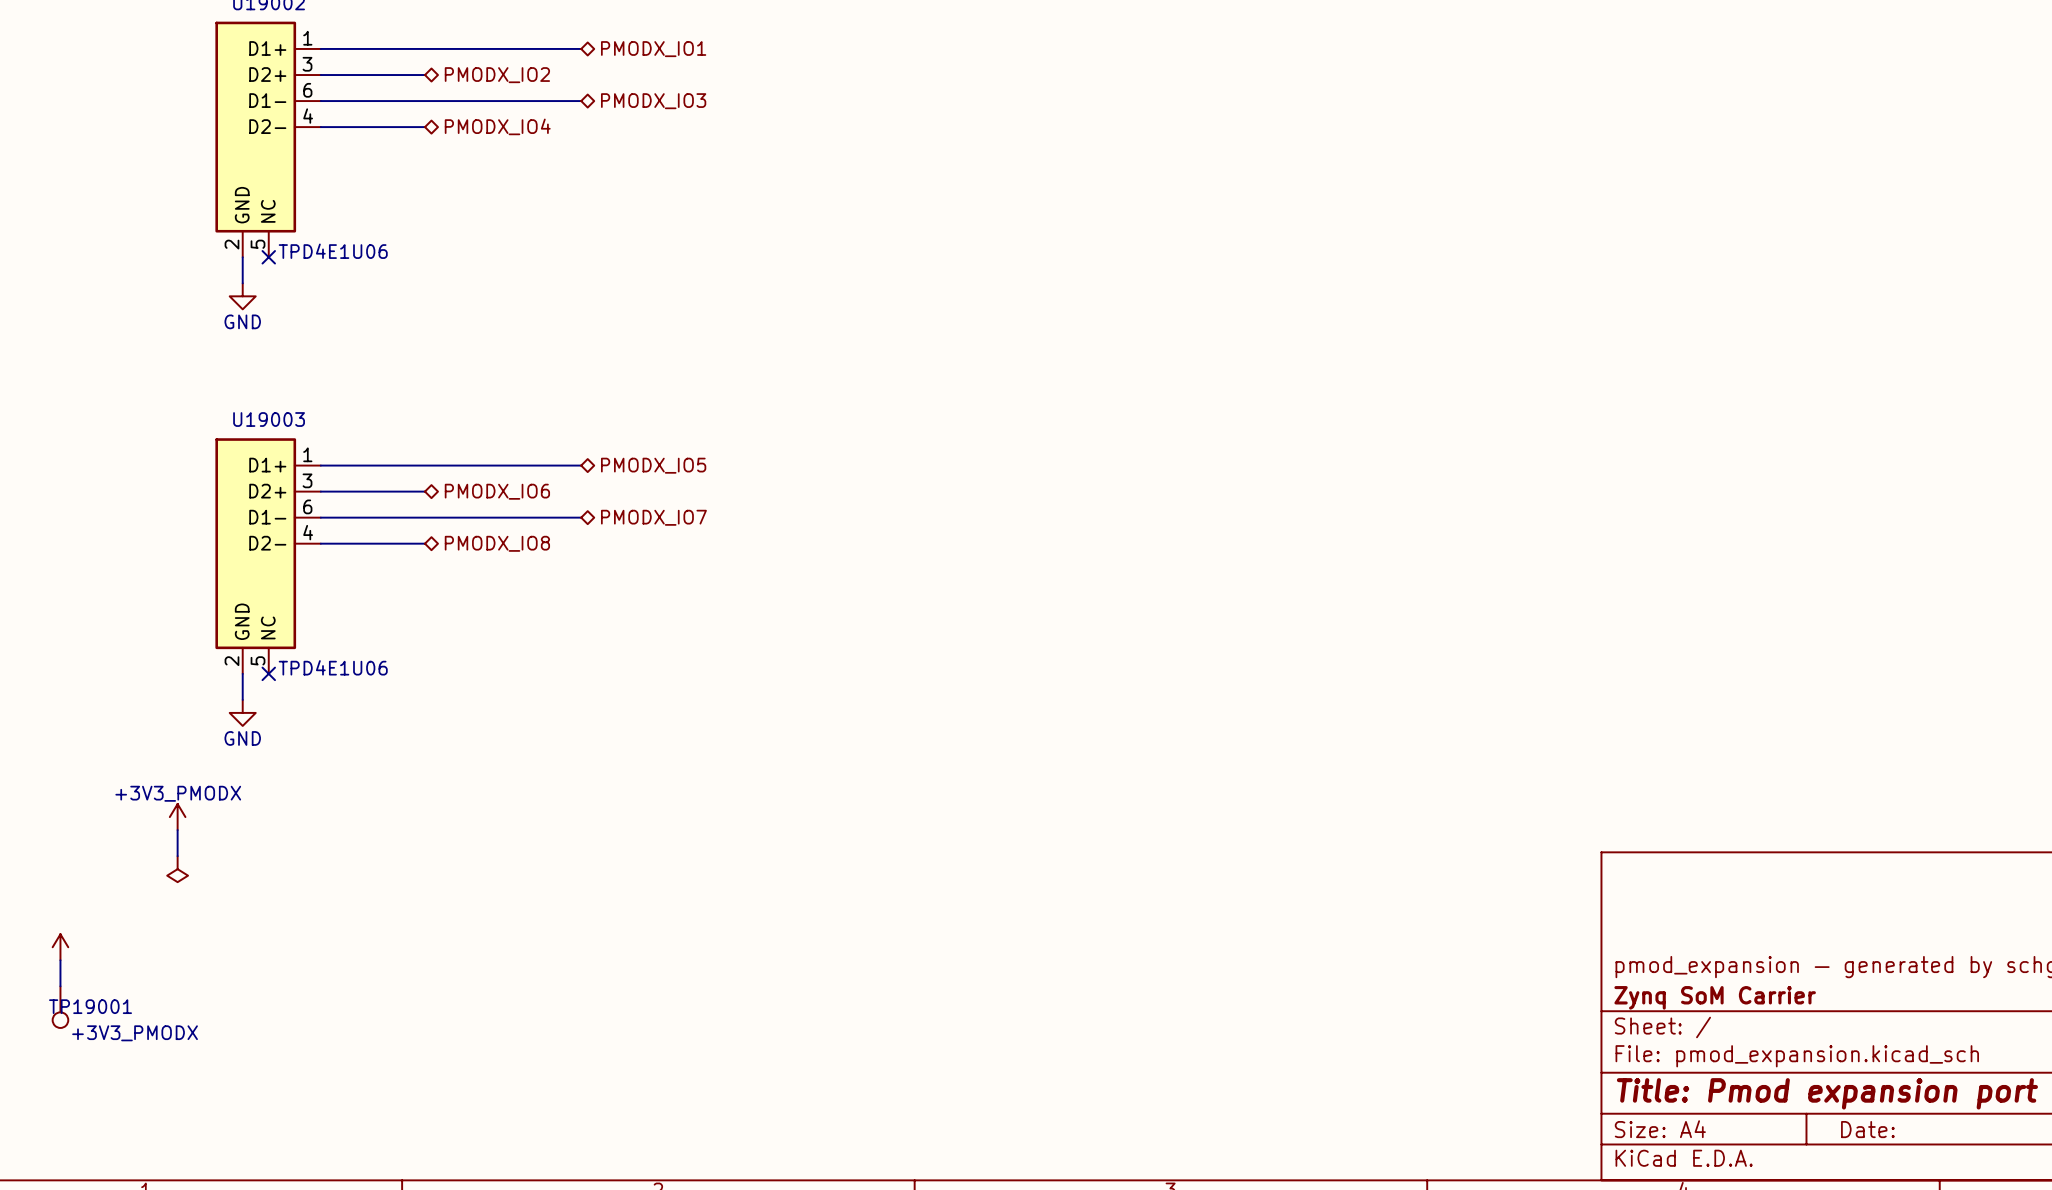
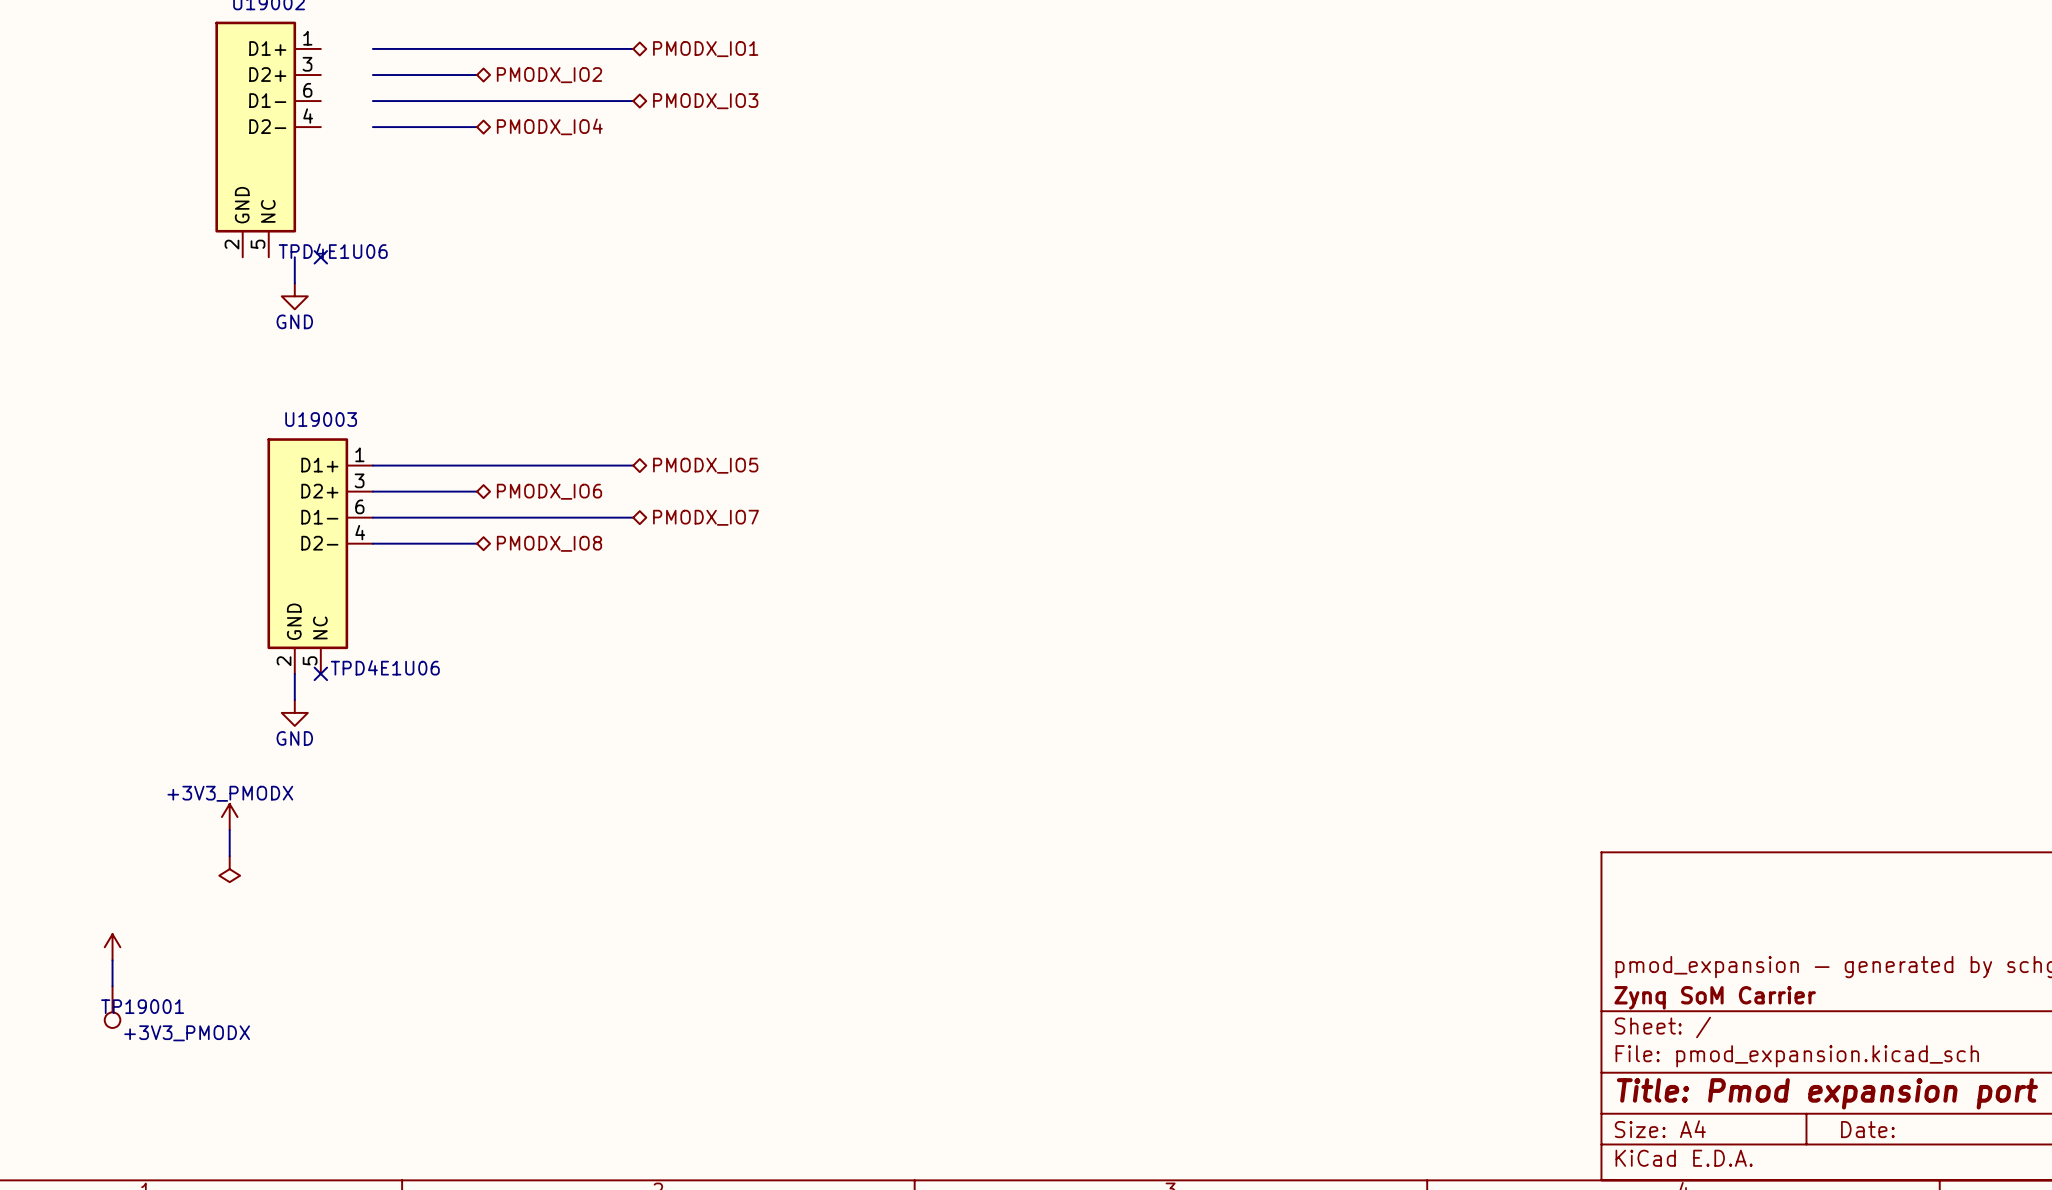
wire: (320, 48) (372, 48) -> none
wire: none -> (581, 48) (633, 48)
hierarchical label position: PMODX_IO1 (653, 49) -> PMODX_IO1 (705, 49)
wire: (320, 75) (372, 75) -> (424, 75) (477, 75)
hierarchical label position: PMODX_IO2 (497, 75) -> PMODX_IO2 (549, 75)
wire: (320, 101) (372, 101) -> none
wire: none -> (581, 101) (633, 101)
hierarchical label position: PMODX_IO3 (653, 101) -> PMODX_IO3 (705, 101)
hierarchical label position: PMODX_IO4 (497, 126) -> PMODX_IO4 (549, 126)
wire: (320, 127) (372, 127) -> (424, 127) (477, 127)
wire: (242, 257) (242, 283) -> (294, 257) (294, 283)
no-connect mark position: (268, 257) -> (320, 257)
power symbol position: GND (242, 296) -> GND (294, 296)
wire: none -> (581, 465) (633, 465)
hierarchical label position: PMODX_IO5 (653, 465) -> PMODX_IO5 (705, 465)
hierarchical label position: PMODX_IO6 (497, 491) -> PMODX_IO6 (549, 491)
wire: none -> (581, 517) (633, 517)
hierarchical label position: PMODX_IO7 (653, 517) -> PMODX_IO7 (706, 517)
hierarchical label position: PMODX_IO8 (497, 543) -> PMODX_IO8 (549, 543)
U19003 position: (268, 556) -> (320, 556)
wire: (242, 673) (242, 699) -> (294, 673) (294, 699)
no-connect mark position: (268, 673) -> (320, 673)
power symbol position: GND (242, 712) -> GND (294, 712)
power symbol position: +3V3_PMODX (177, 817) -> +3V3_PMODX (229, 817)
wire: (177, 830) (177, 856) -> (229, 830) (229, 856)
power symbol position: (177, 869) -> (229, 869)
power symbol position: (60, 947) -> (112, 947)
wire: (60, 960) (60, 986) -> (112, 960) (112, 986)
TP19001 position: (60, 1007) -> (112, 1007)

